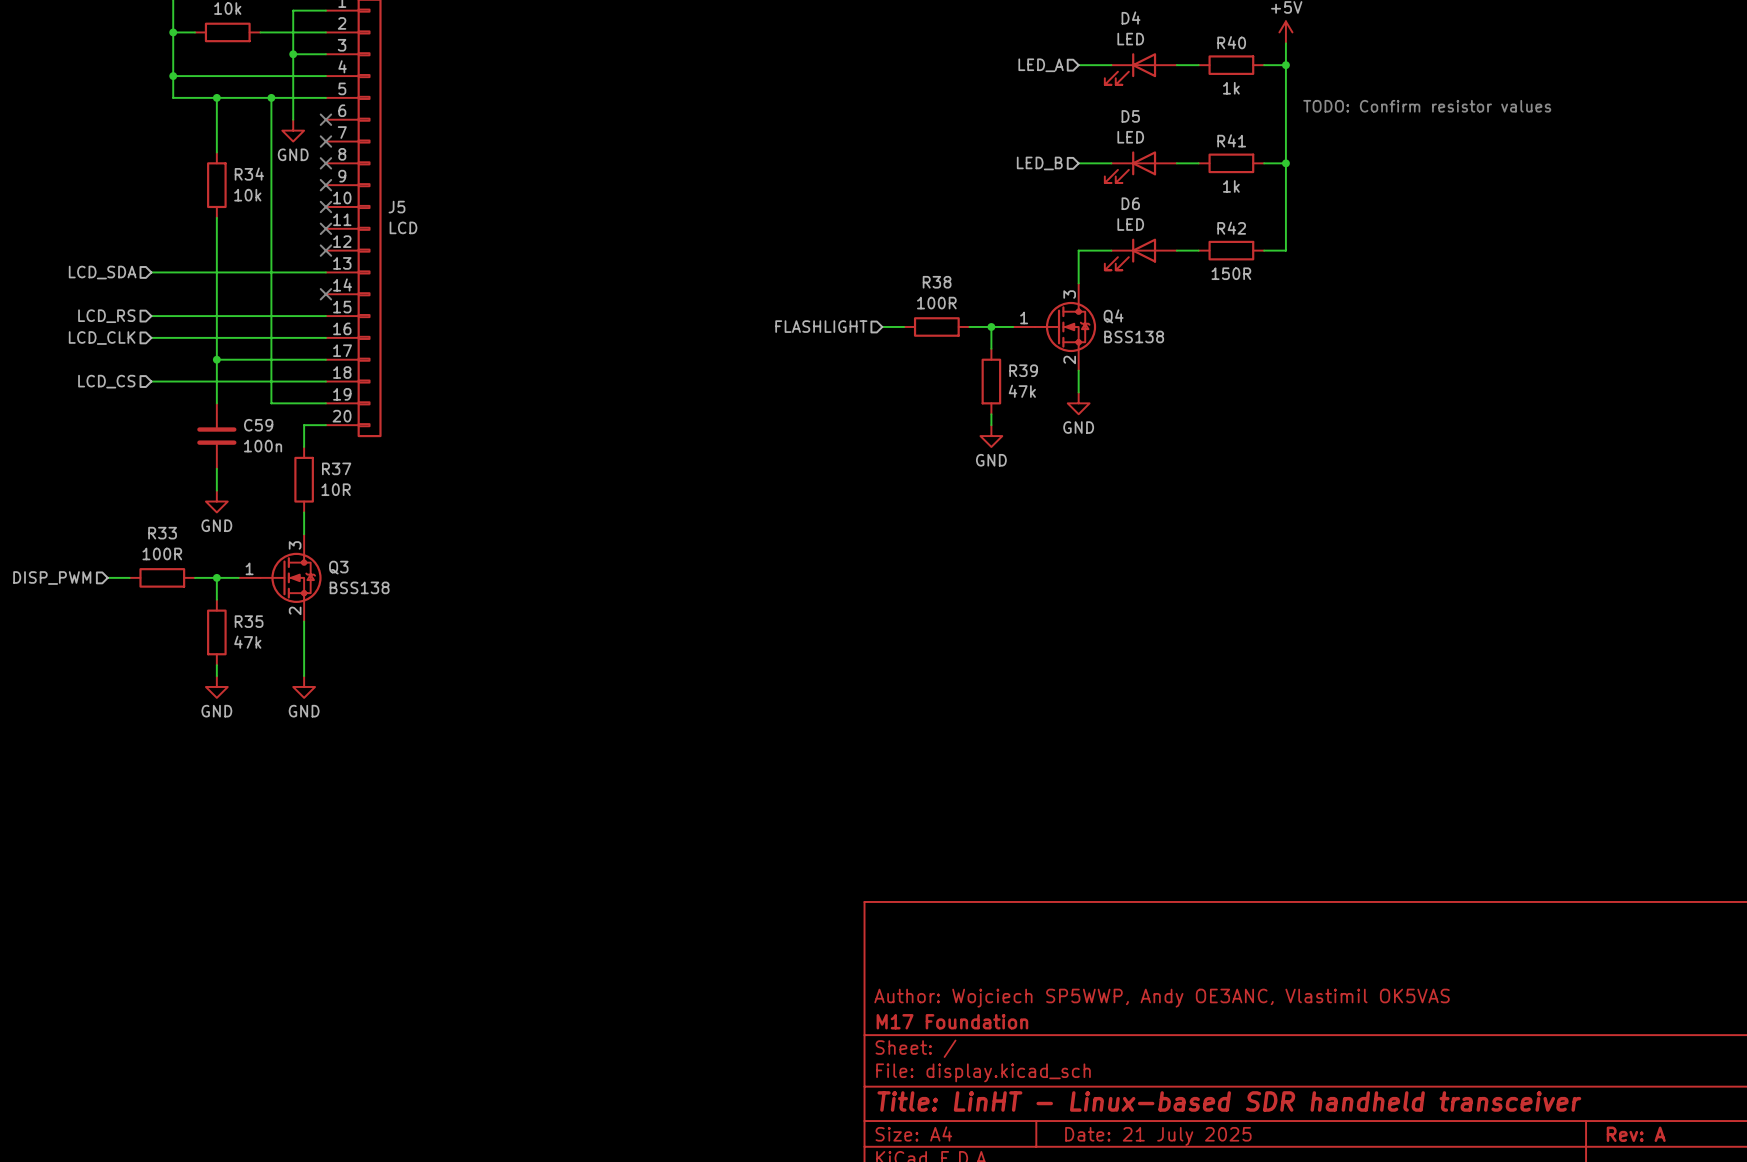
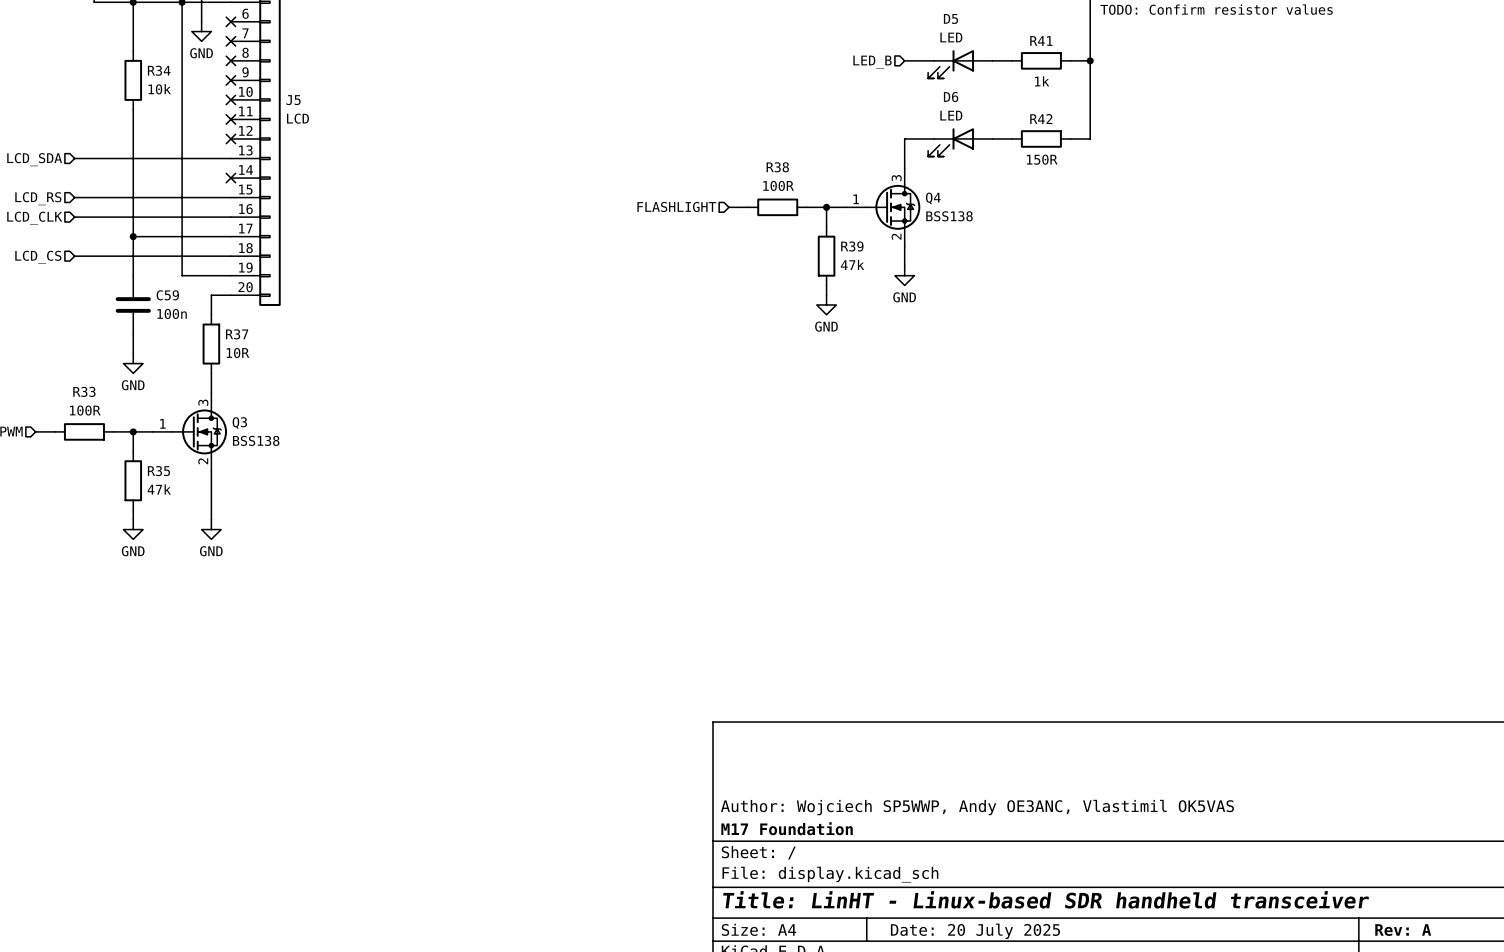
title block: Date: 21 July 2025 (1158, 1136) -> Date: 20 July 2025 (975, 931)

